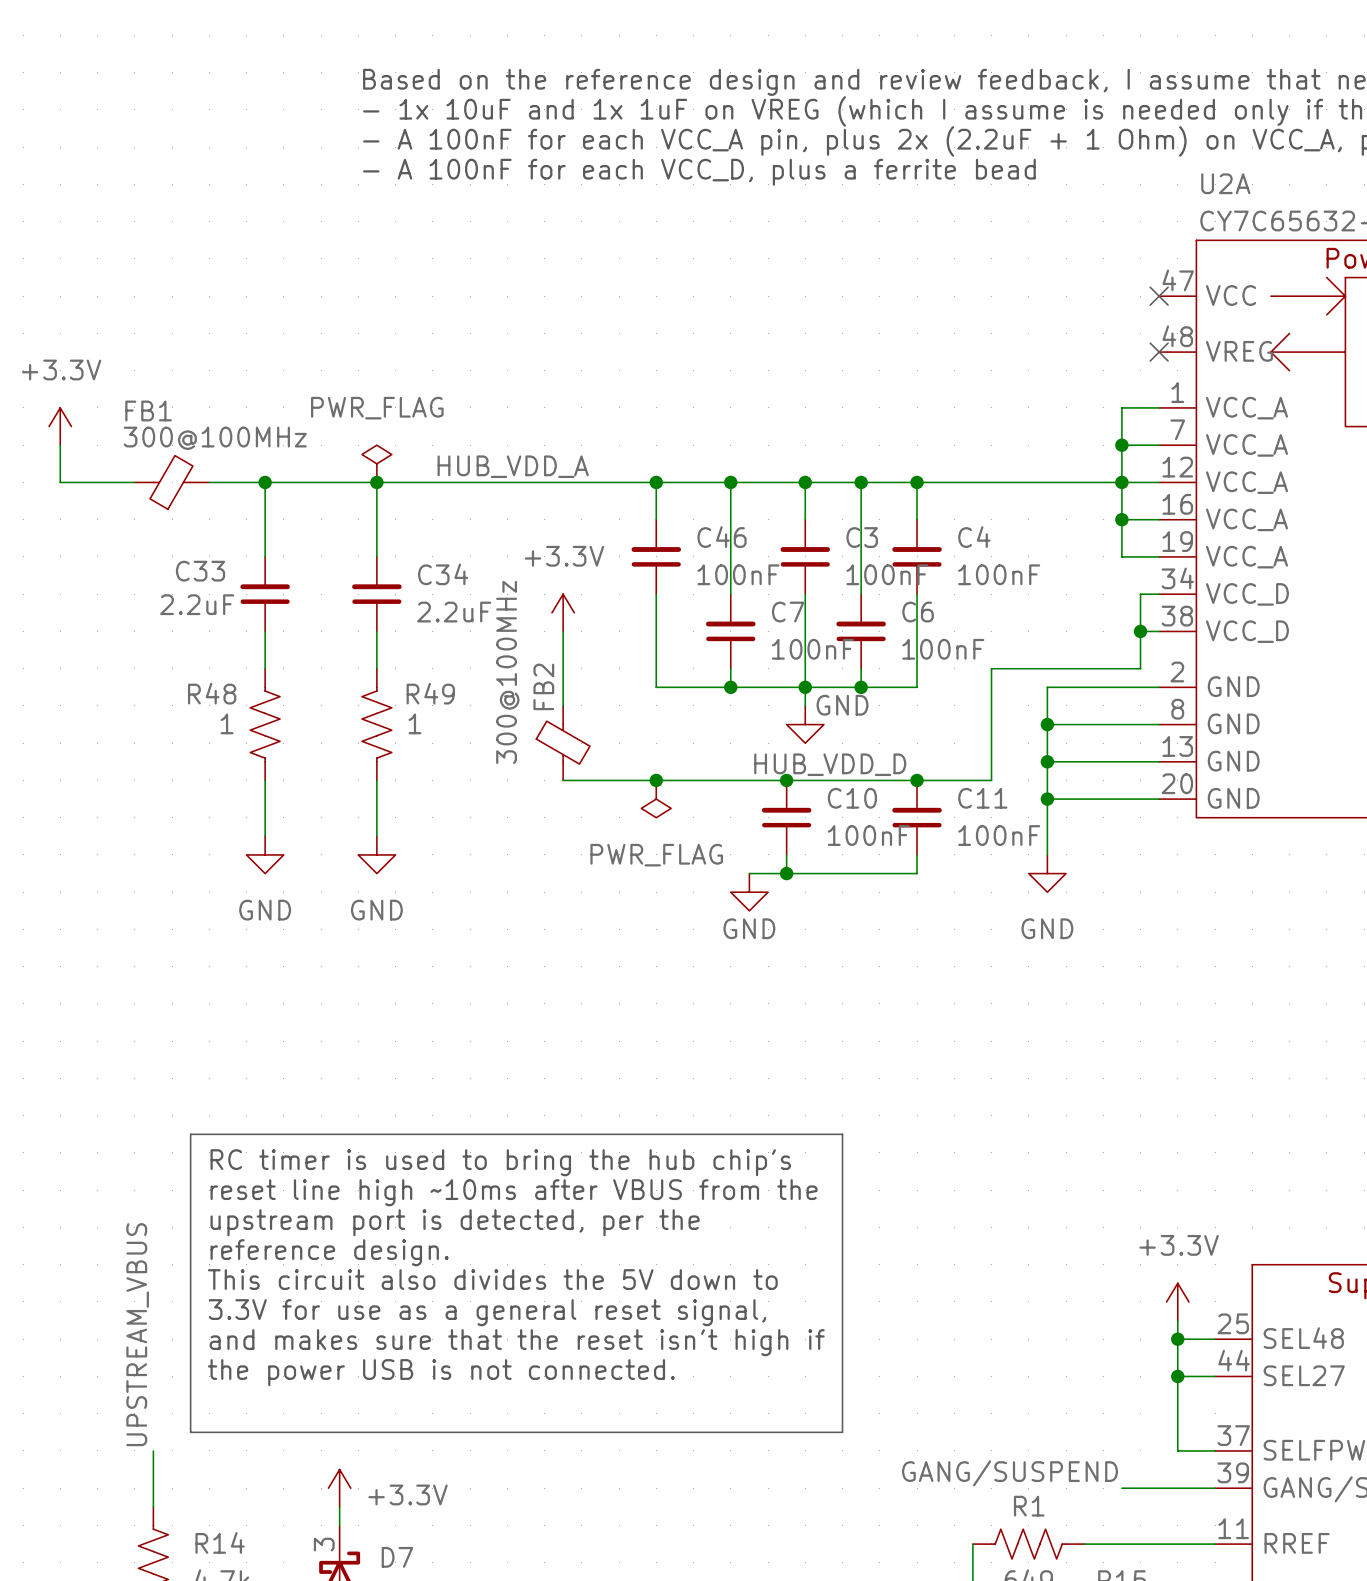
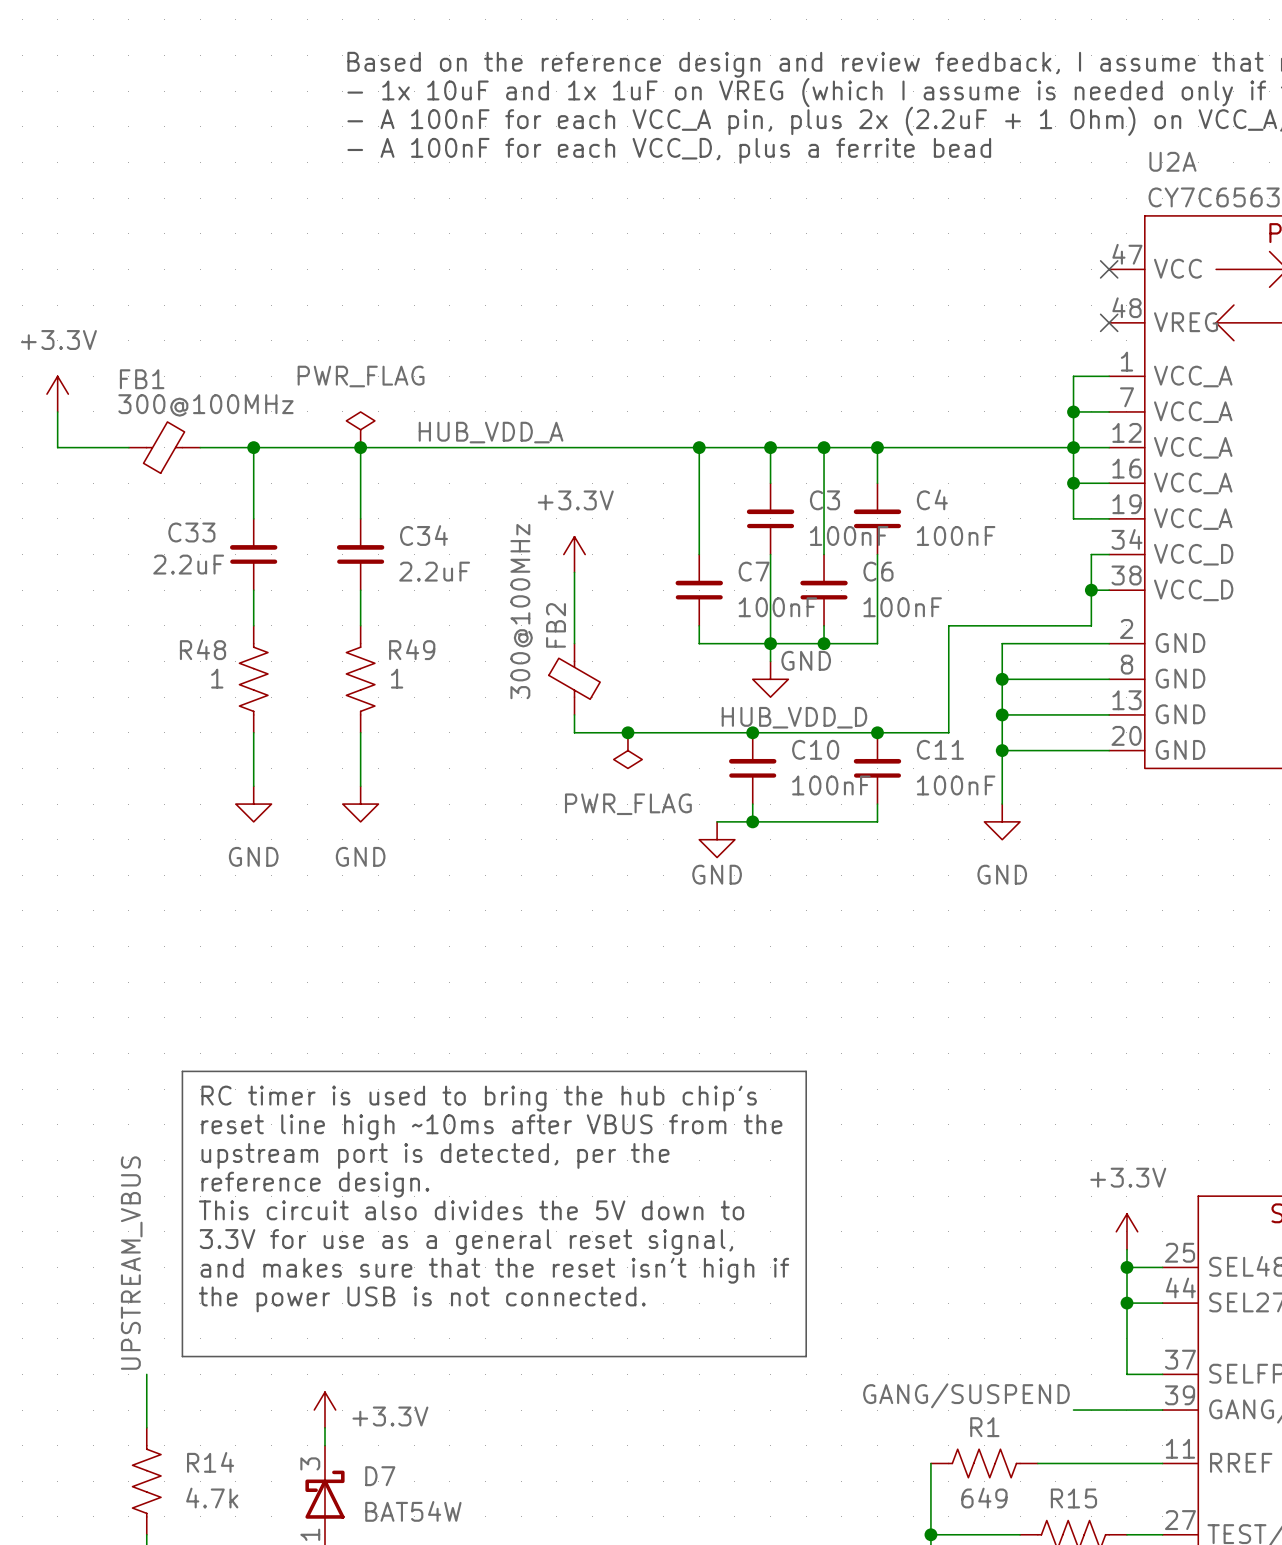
wire: (656, 482) (656, 519) -> none
junction: (656, 482) -> none
C46: 100nF (656, 556) -> none
wire: (656, 594) (656, 687) (730, 687) -> none
power symbol position: +3.3V (563, 612) -> +3.3V (574, 554)
wire: (563, 631) (563, 705) -> (574, 572) (574, 643)
junction: (730, 687) -> none
FB2 position: (563, 743) -> (574, 679)
wire: (563, 780) (600, 780) -> (574, 714) (574, 732)

